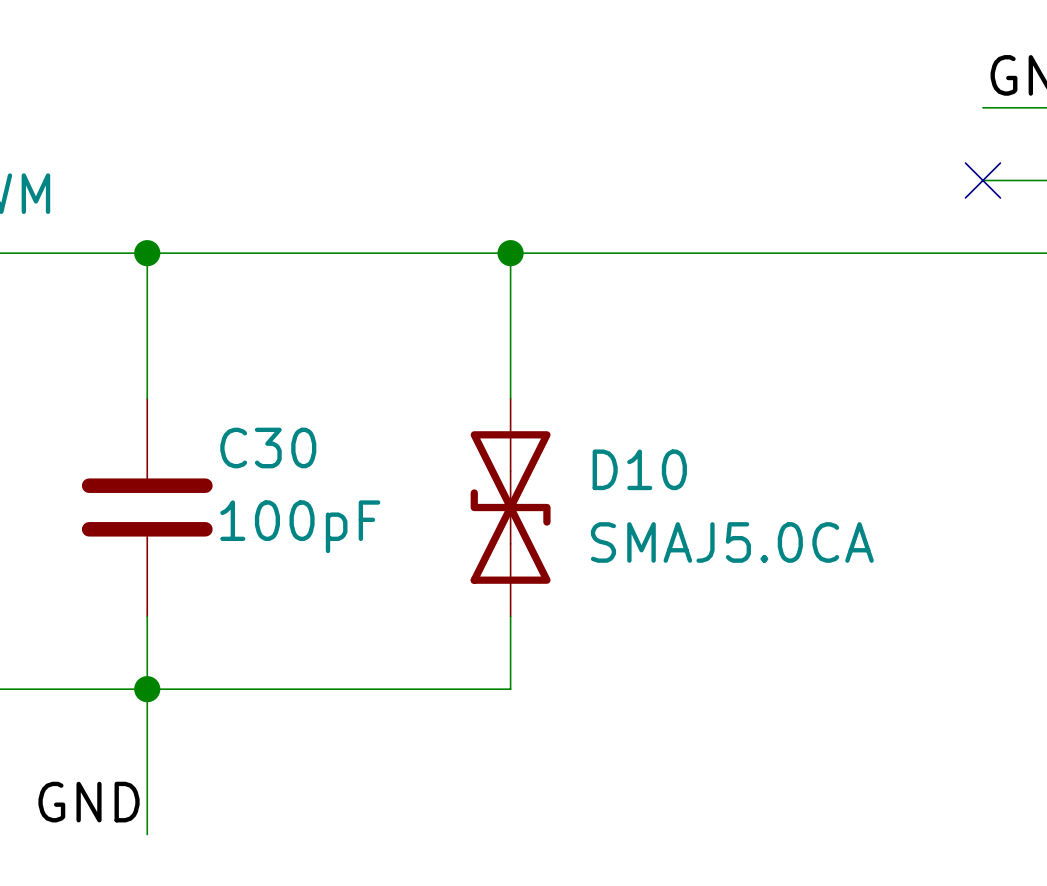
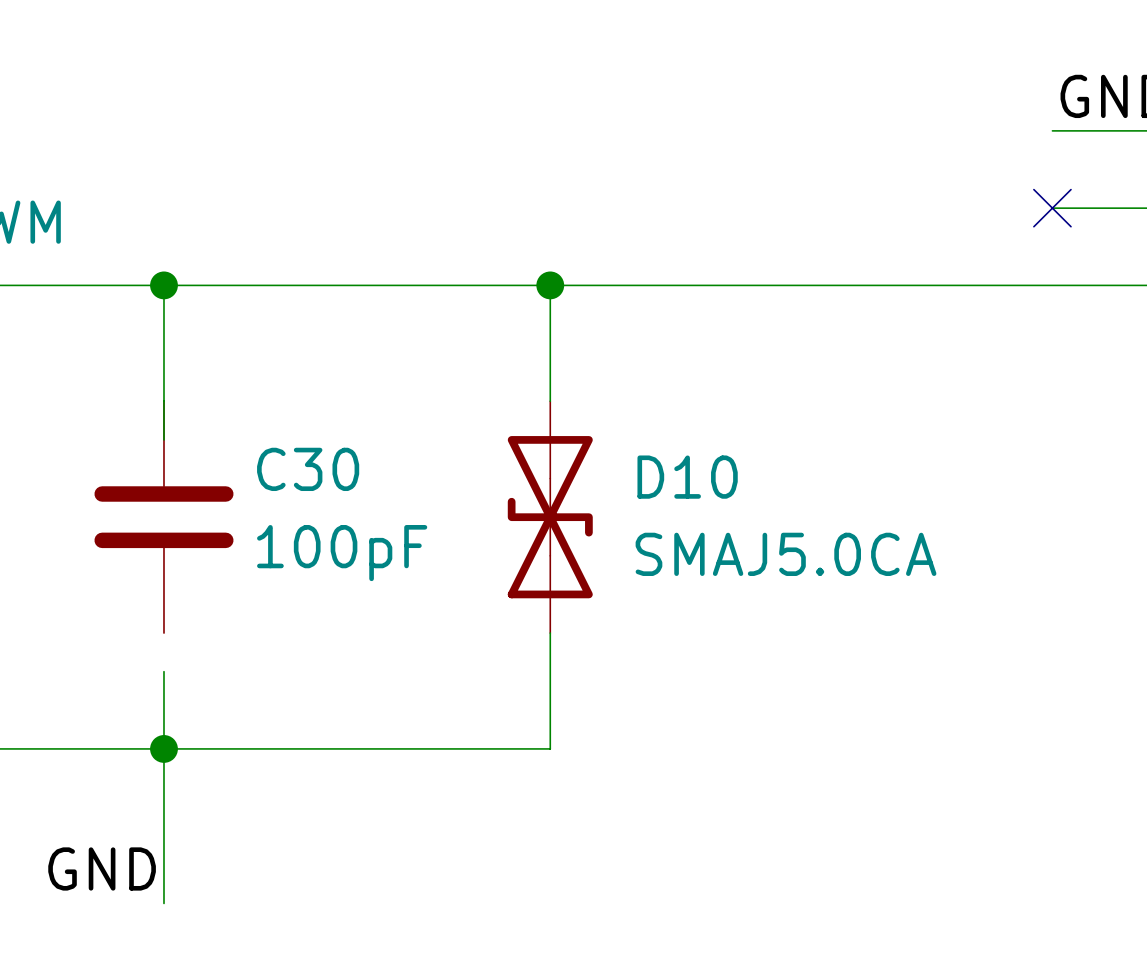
C30 name position: C30 (268, 448) -> C30 (308, 469)
C30 position: (147, 507) -> (163, 517)
D10 position: (510, 507) -> (550, 517)
C30 value position: 100pF (300, 526) -> 100pF (342, 553)

